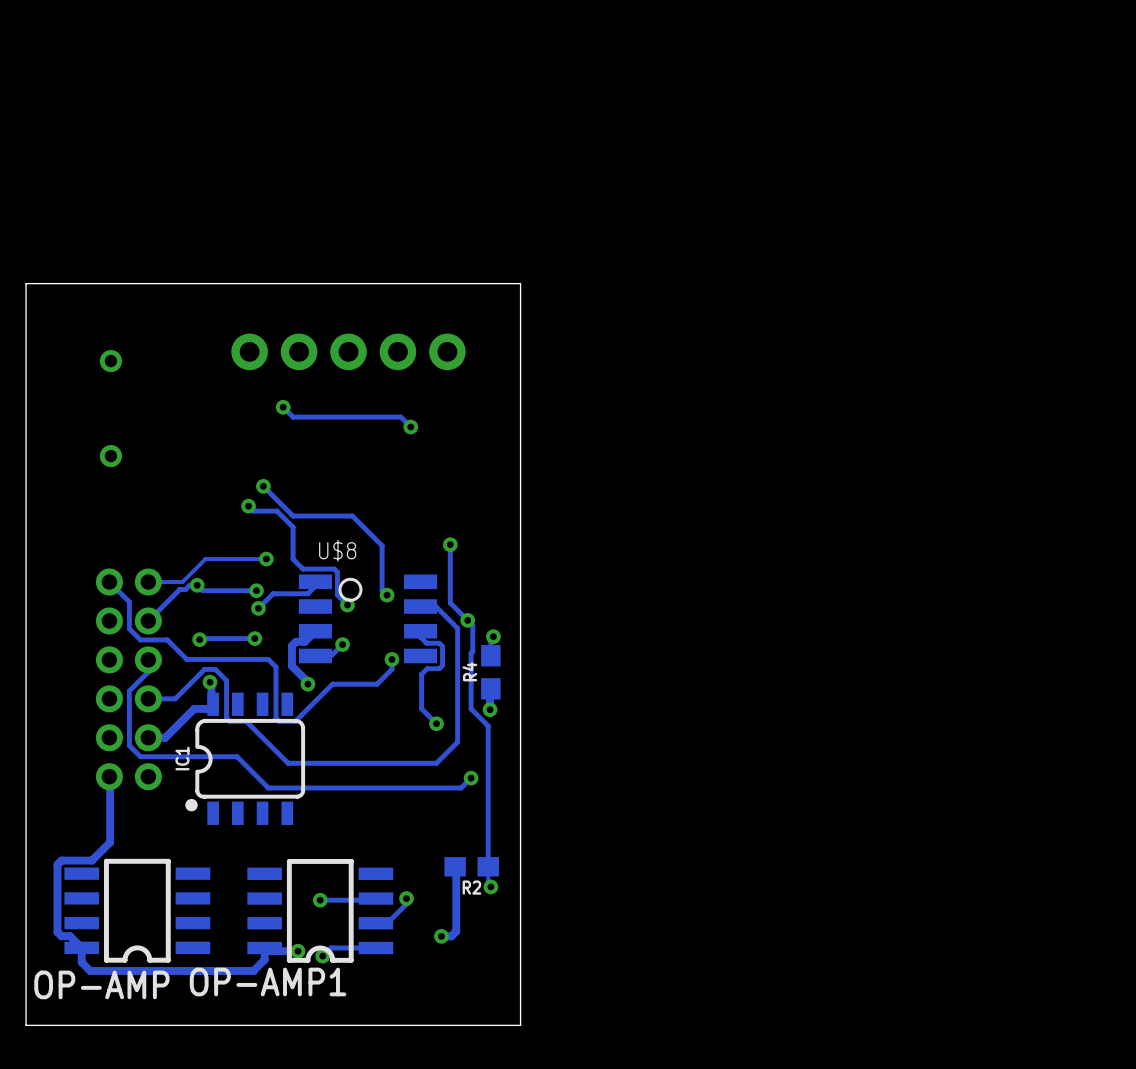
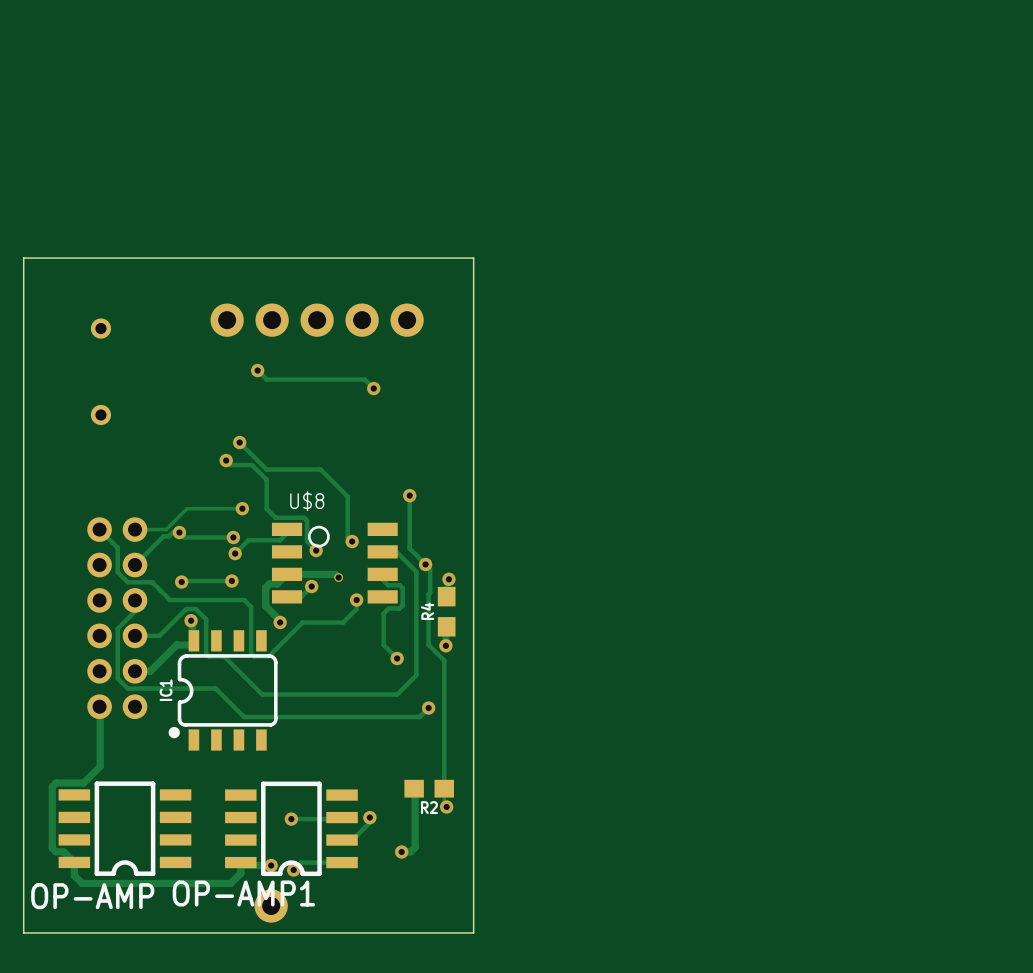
track: none -> (287, 574) (335, 574) (338, 577)
via: none -> (338, 577)
part: none -> (271, 905)

